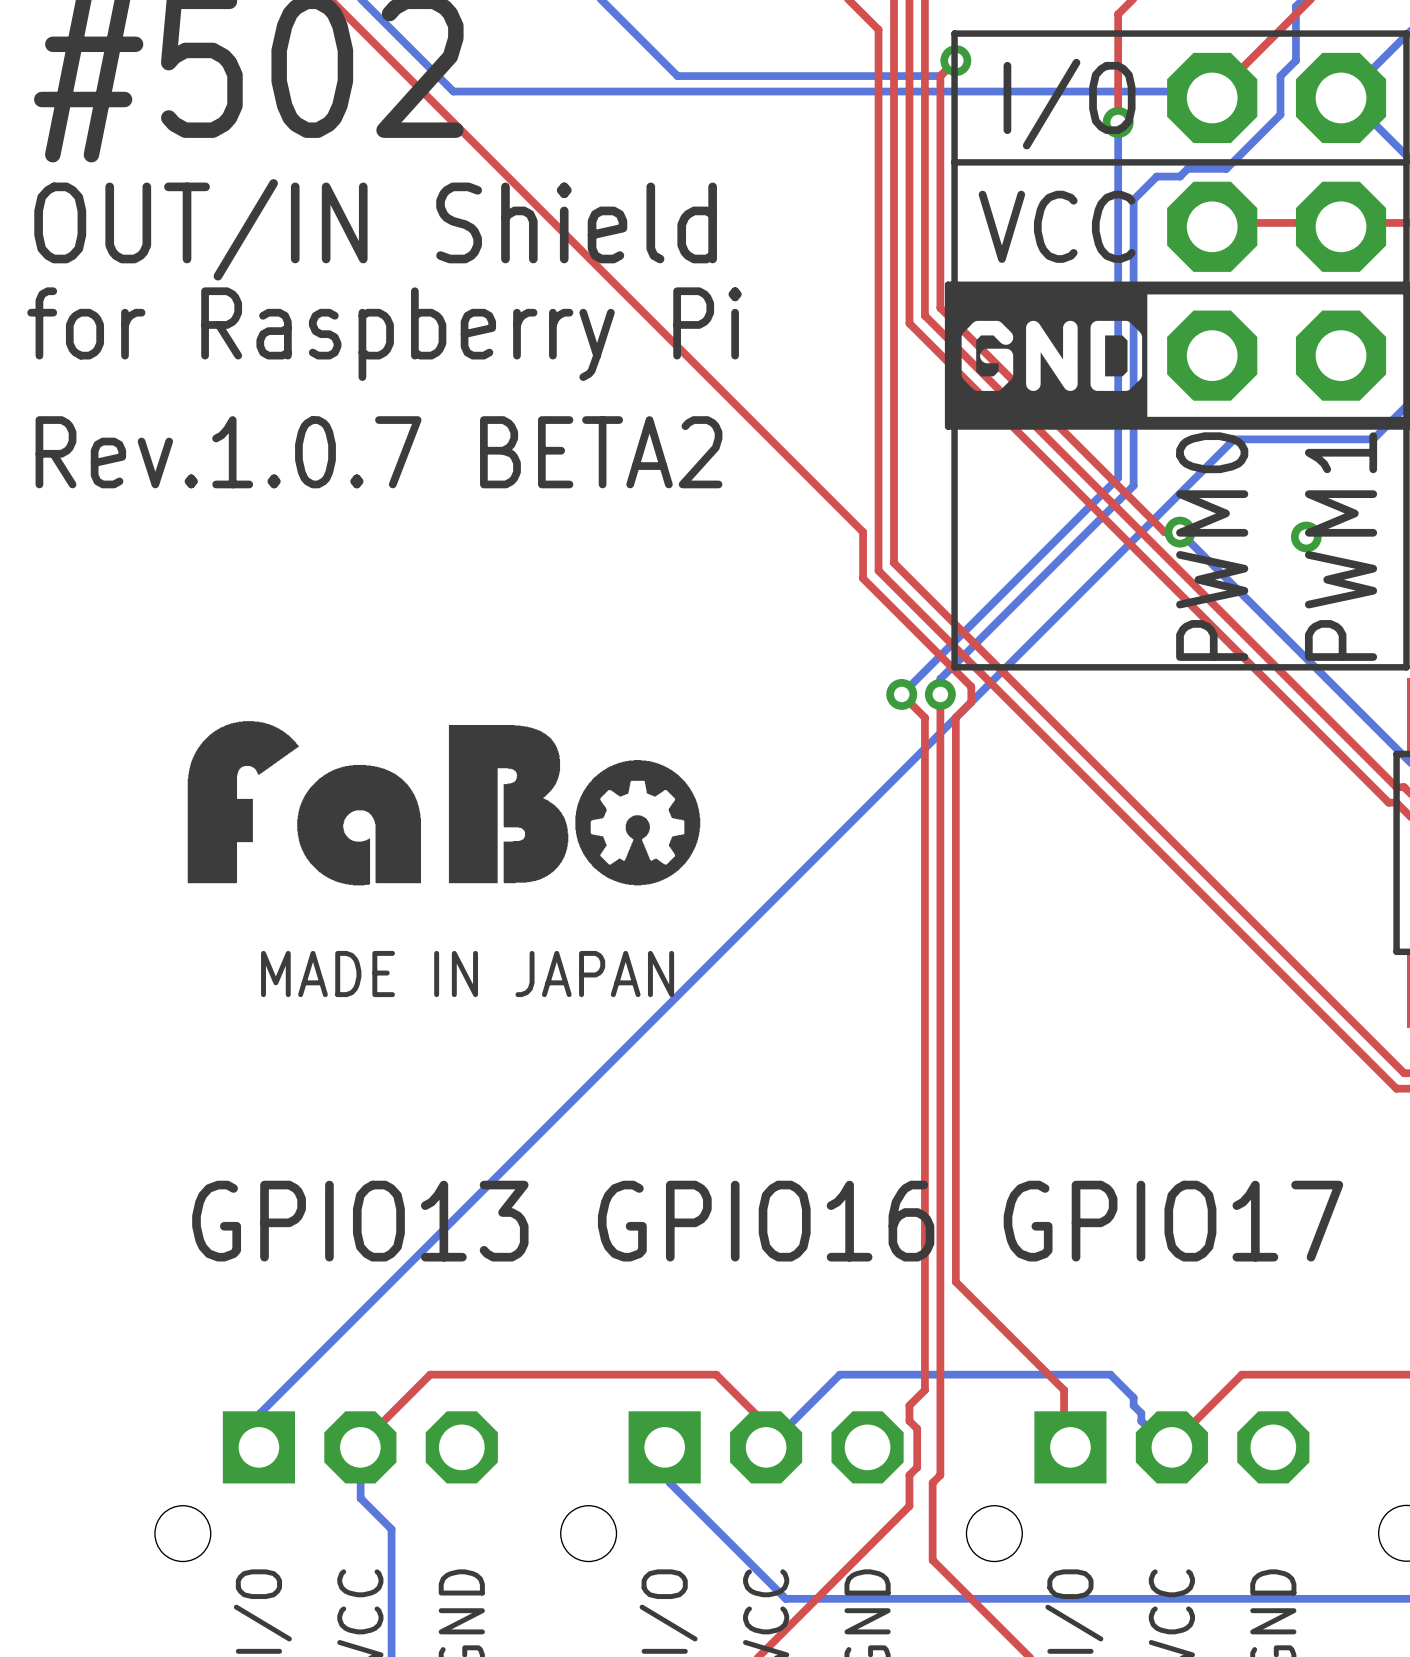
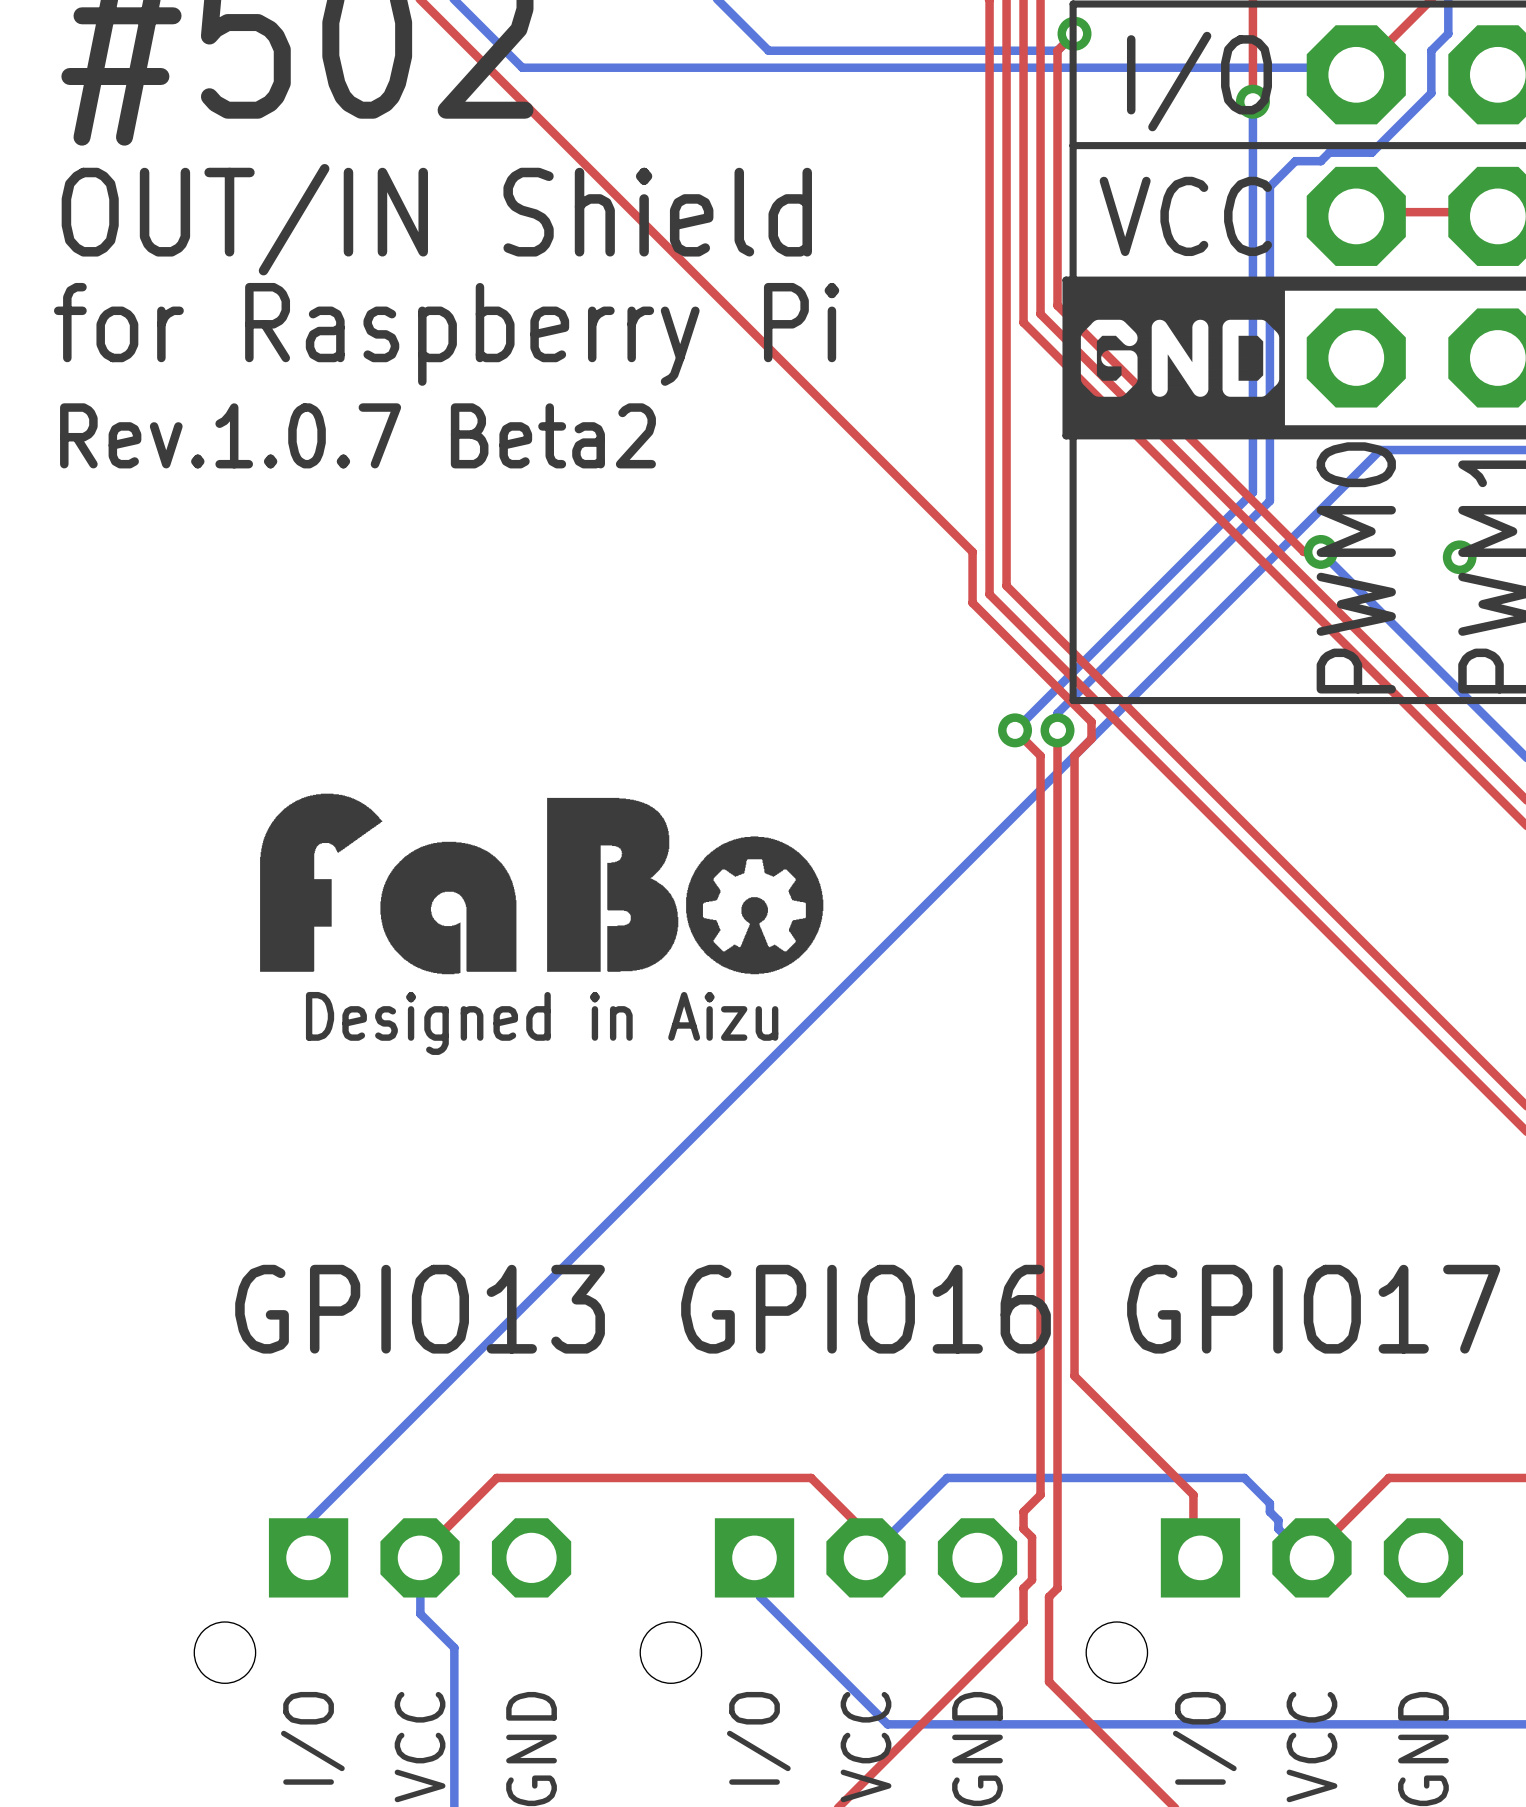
text: Rev.1.0.7 BETA2 (378, 452) -> Rev.1.0.7 Beta2 (357, 435)
drawing position: (443, 803) -> (541, 883)
text: MADE IN JAPAN (467, 974) -> Designed in Aizu (542, 1023)

